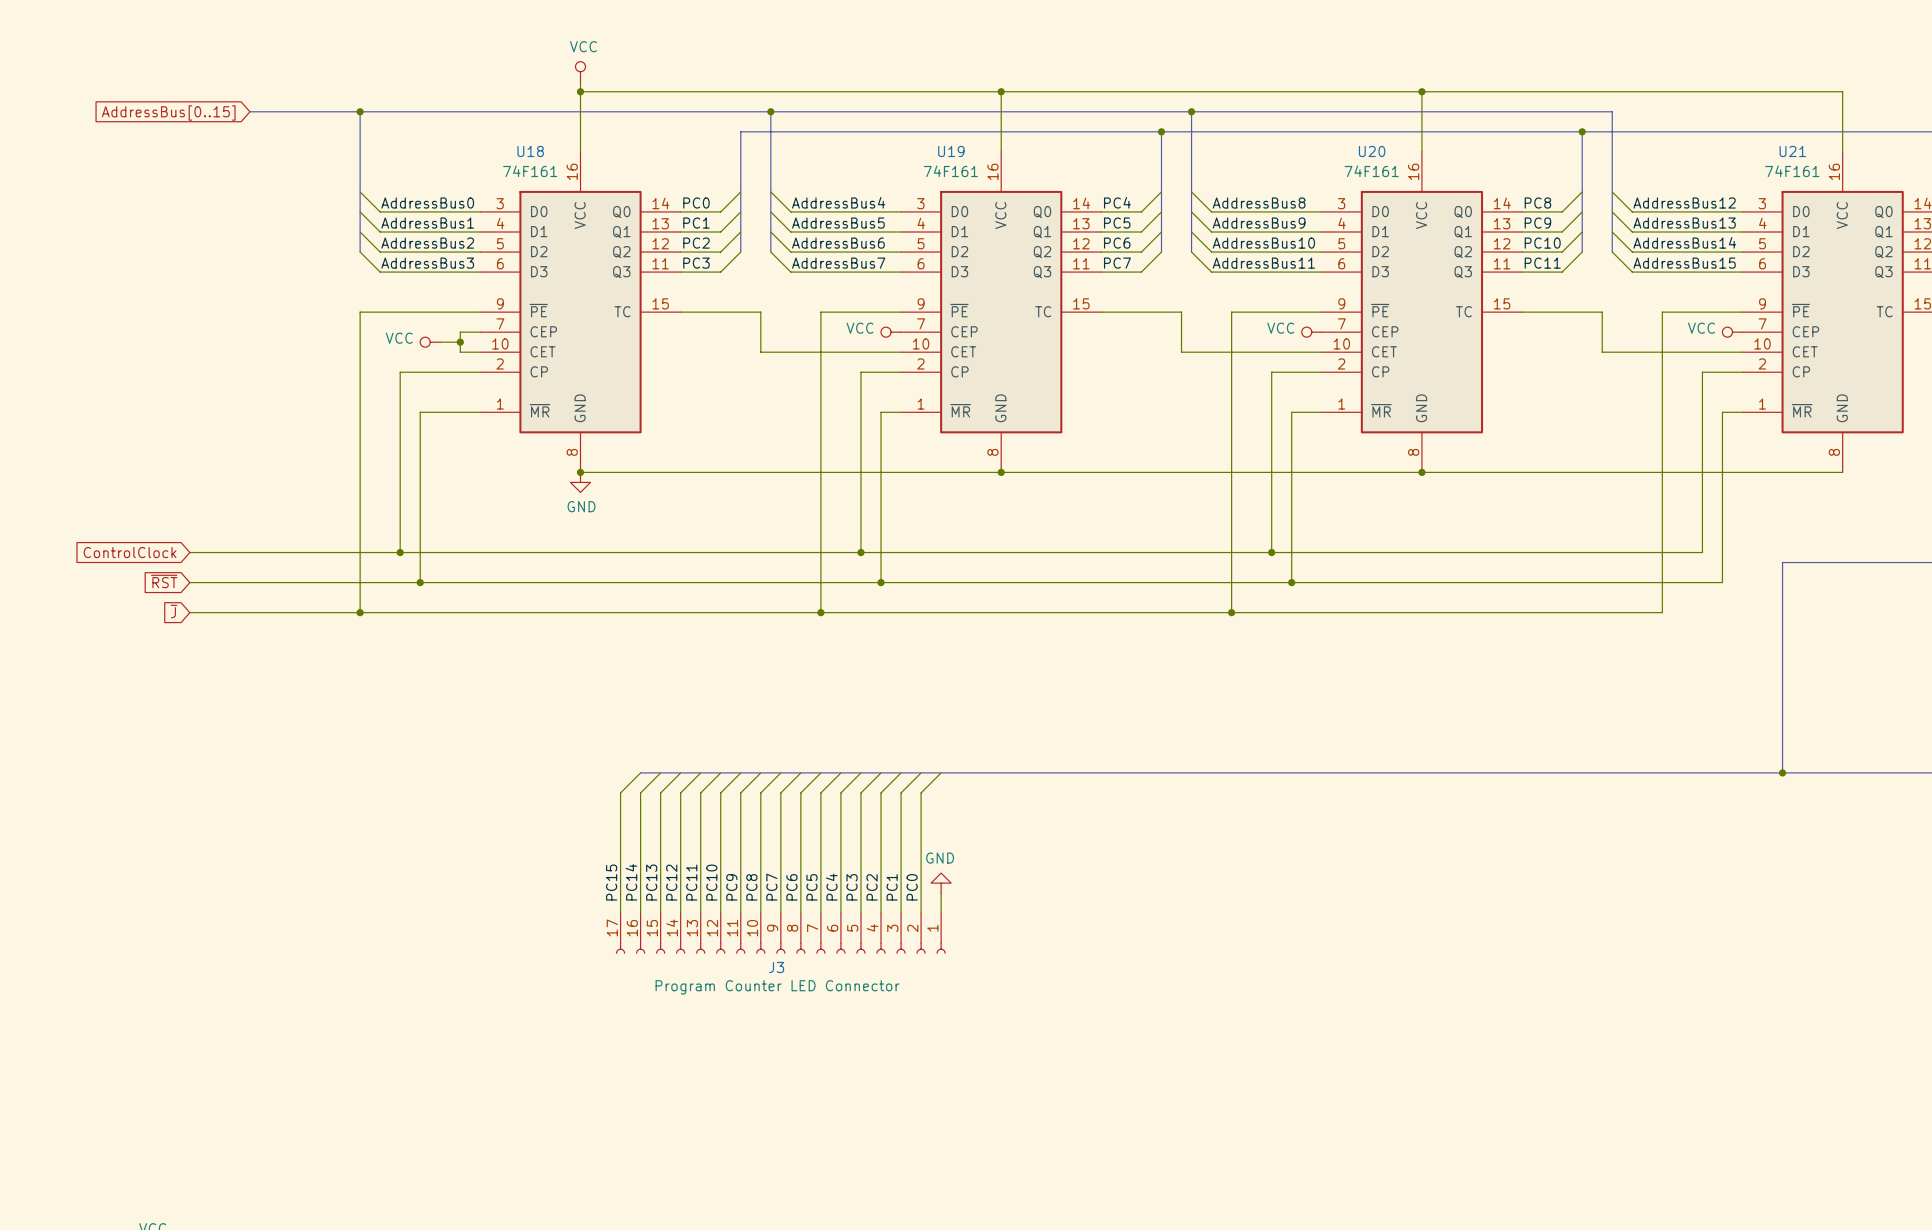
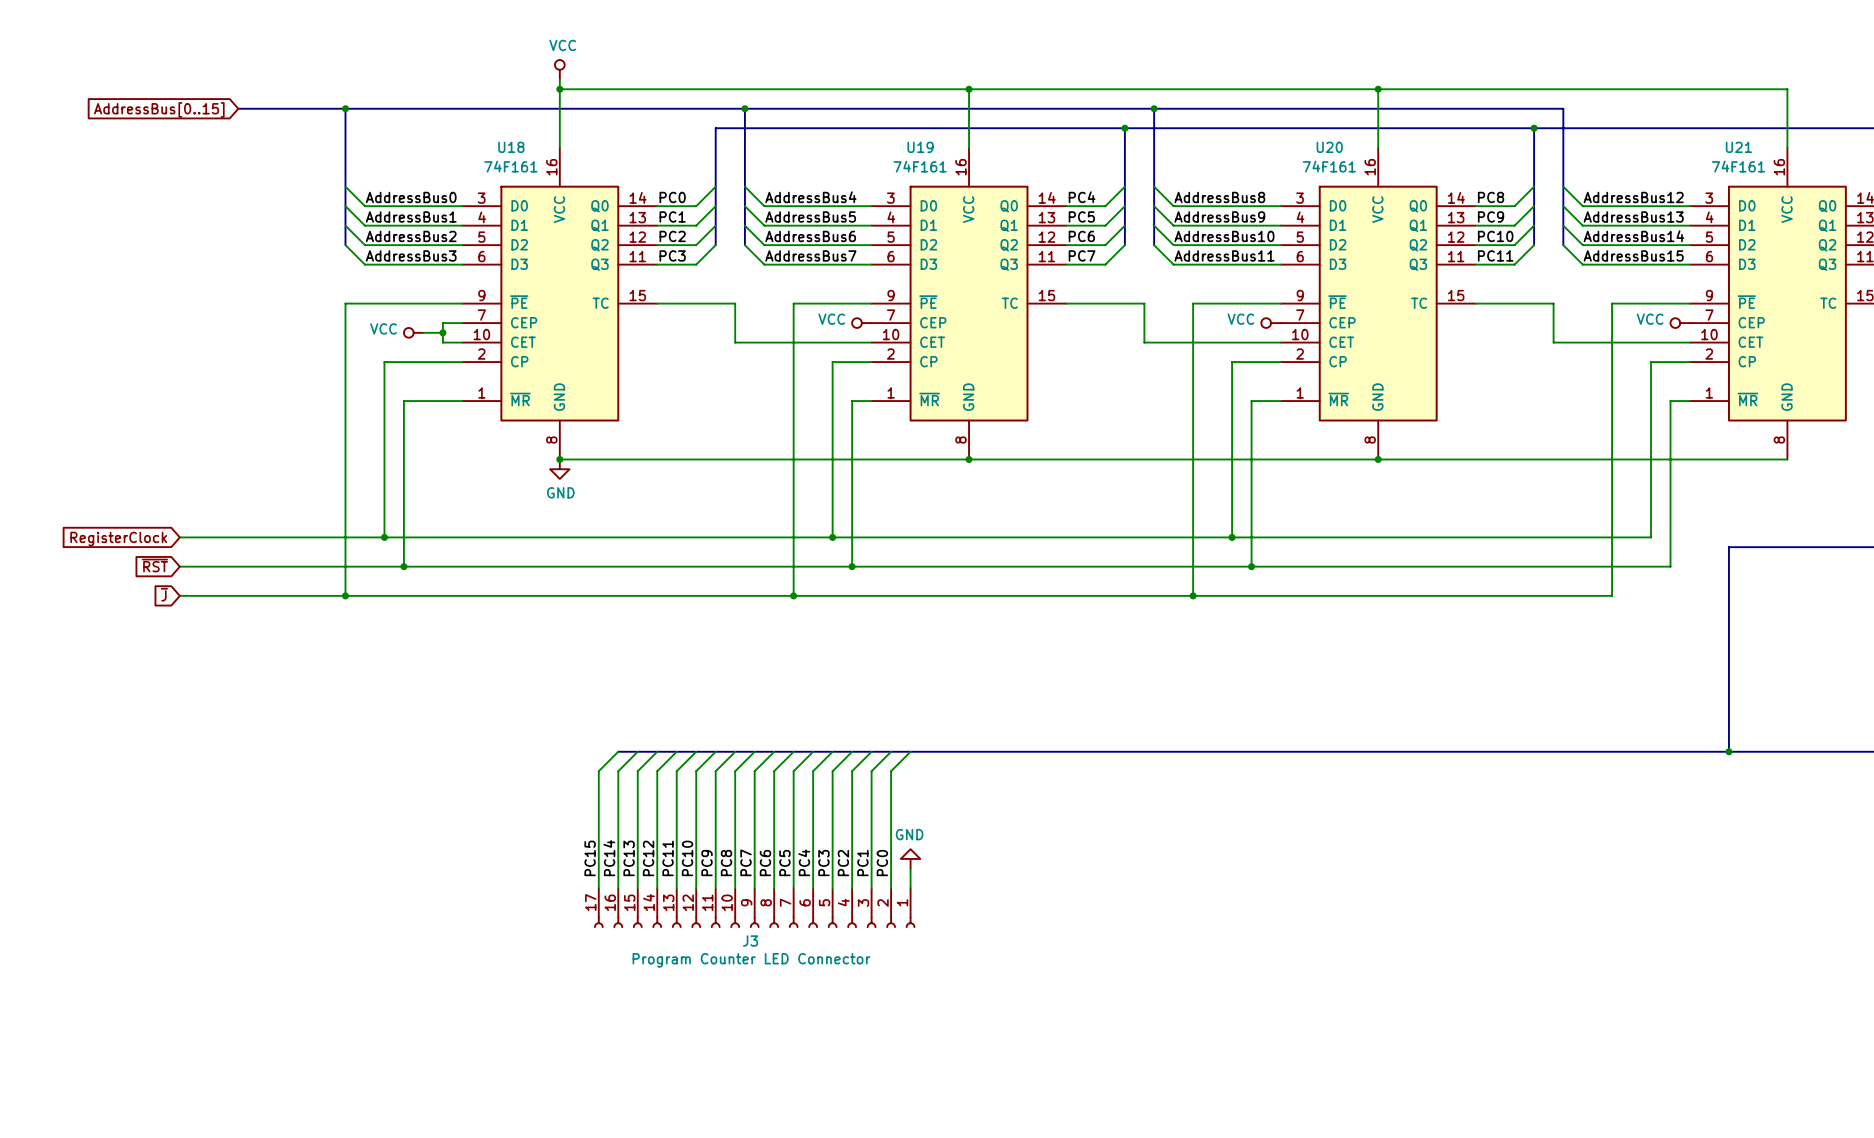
global label: ControlClock (130, 552) -> RegisterClock (118, 539)

